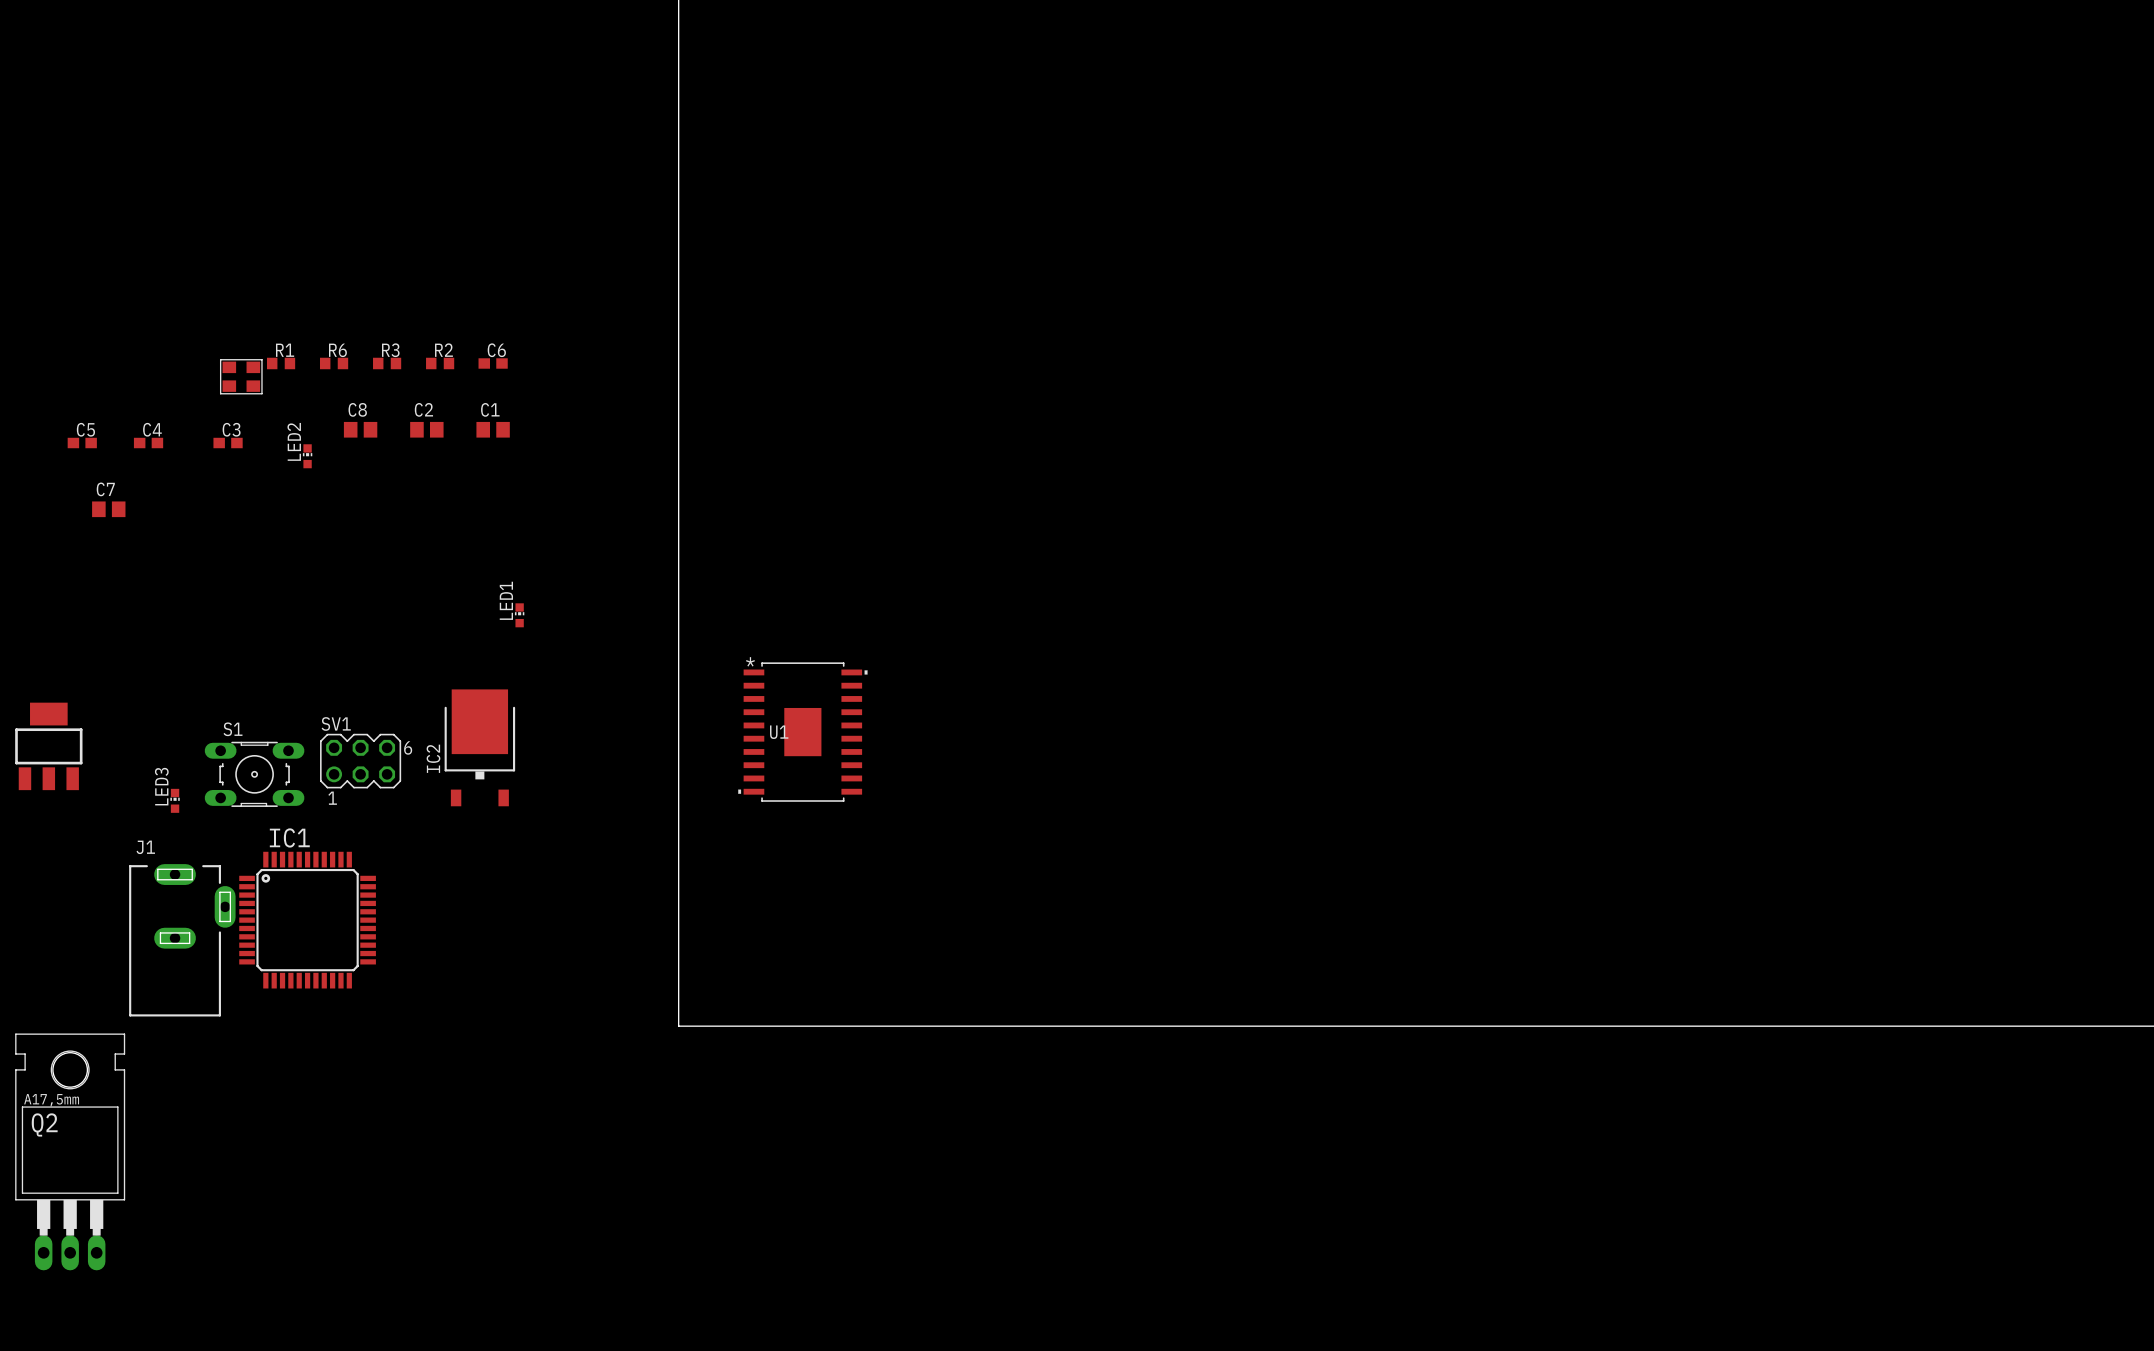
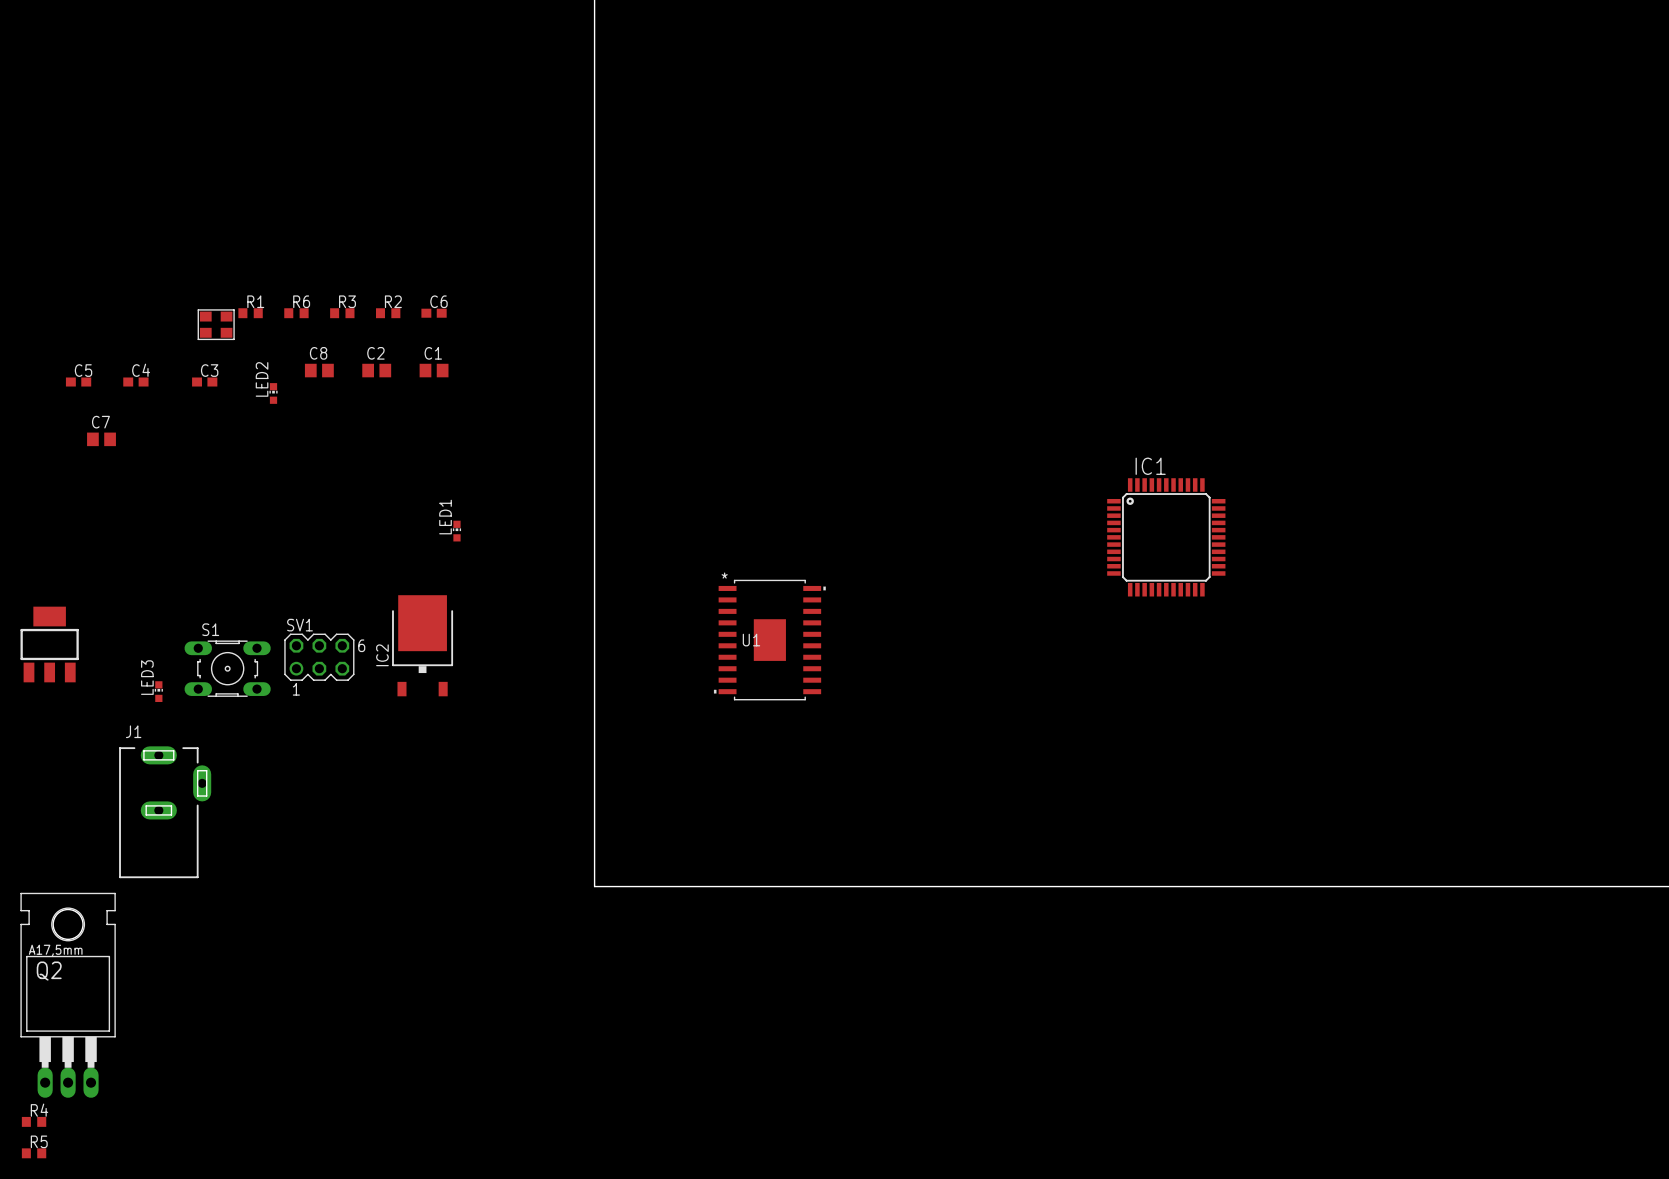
U1 position: (802, 732) -> (769, 640)
IC1 position: (307, 920) -> (1166, 537)
R4: none -> (34, 1121)
R5: none -> (34, 1153)

